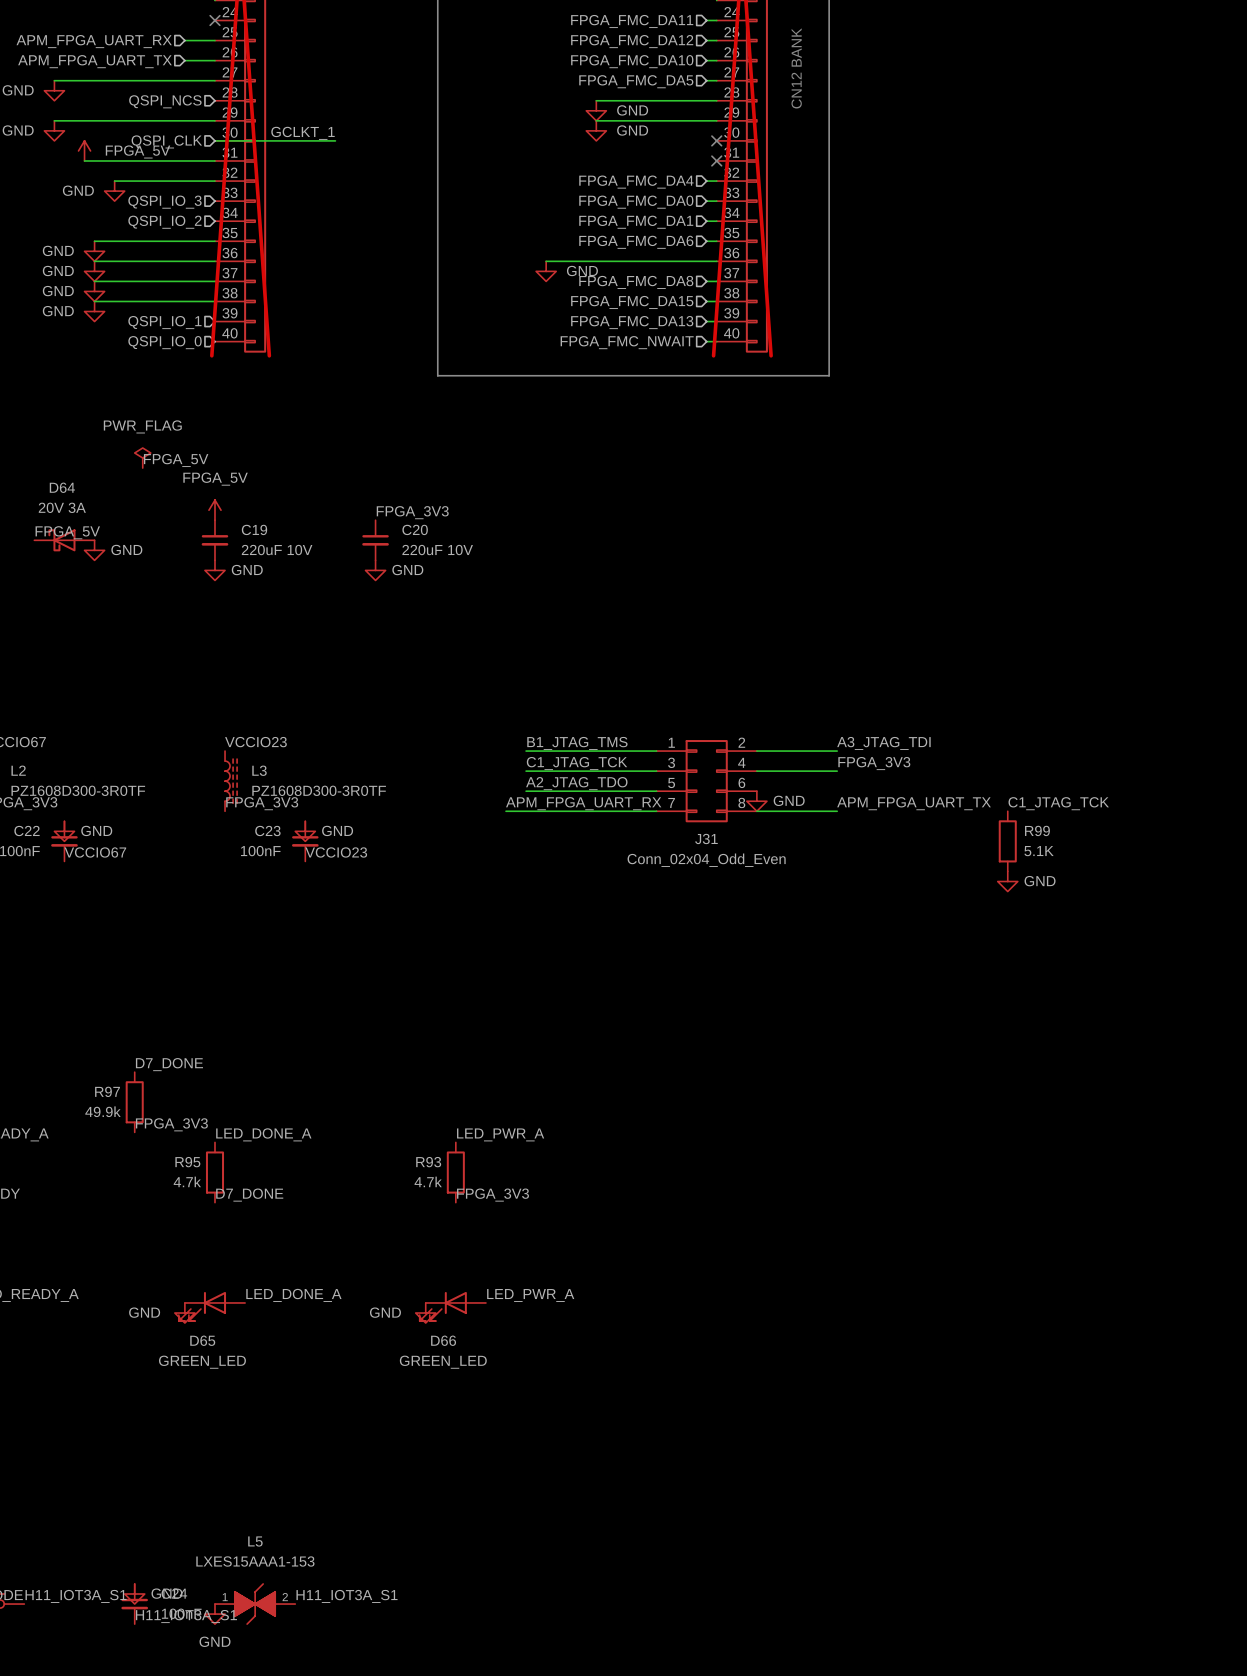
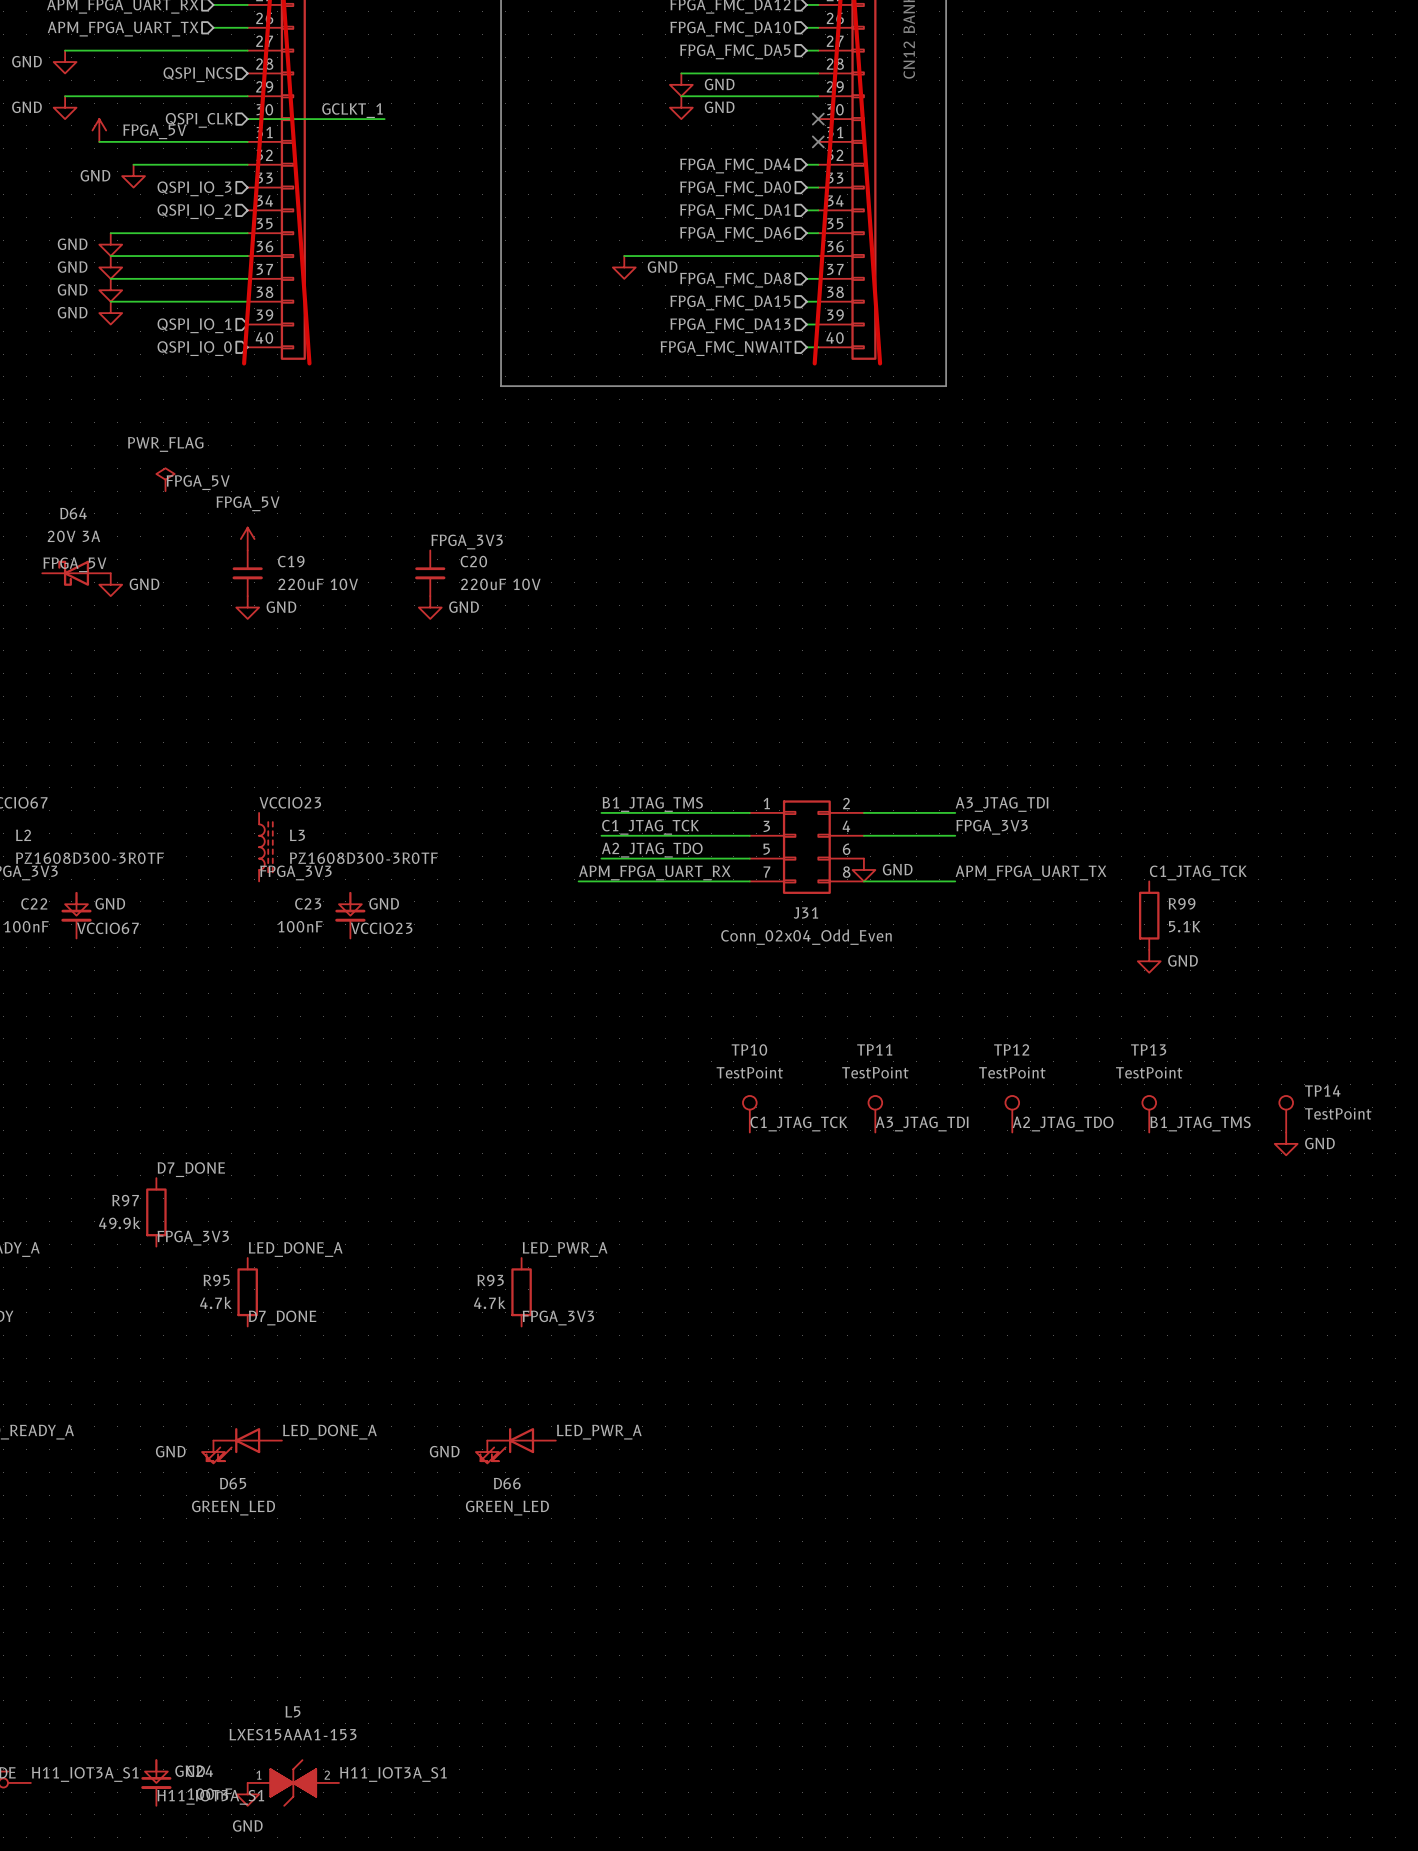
TP10: none -> TestPoint (749, 1114)
TP11: none -> TestPoint (875, 1114)
TP12: none -> TestPoint (1012, 1114)
TP13: none -> TestPoint (1149, 1114)
TP14: none -> TestPoint (1286, 1114)
label: none -> C1_JTAG_TCK (798, 1124)
label: none -> A3_JTAG_TDI (922, 1124)
label: none -> A2_JTAG_TDO (1063, 1124)
label: none -> B1_JTAG_TMS (1200, 1124)
power symbol: none -> GND (1286, 1143)

